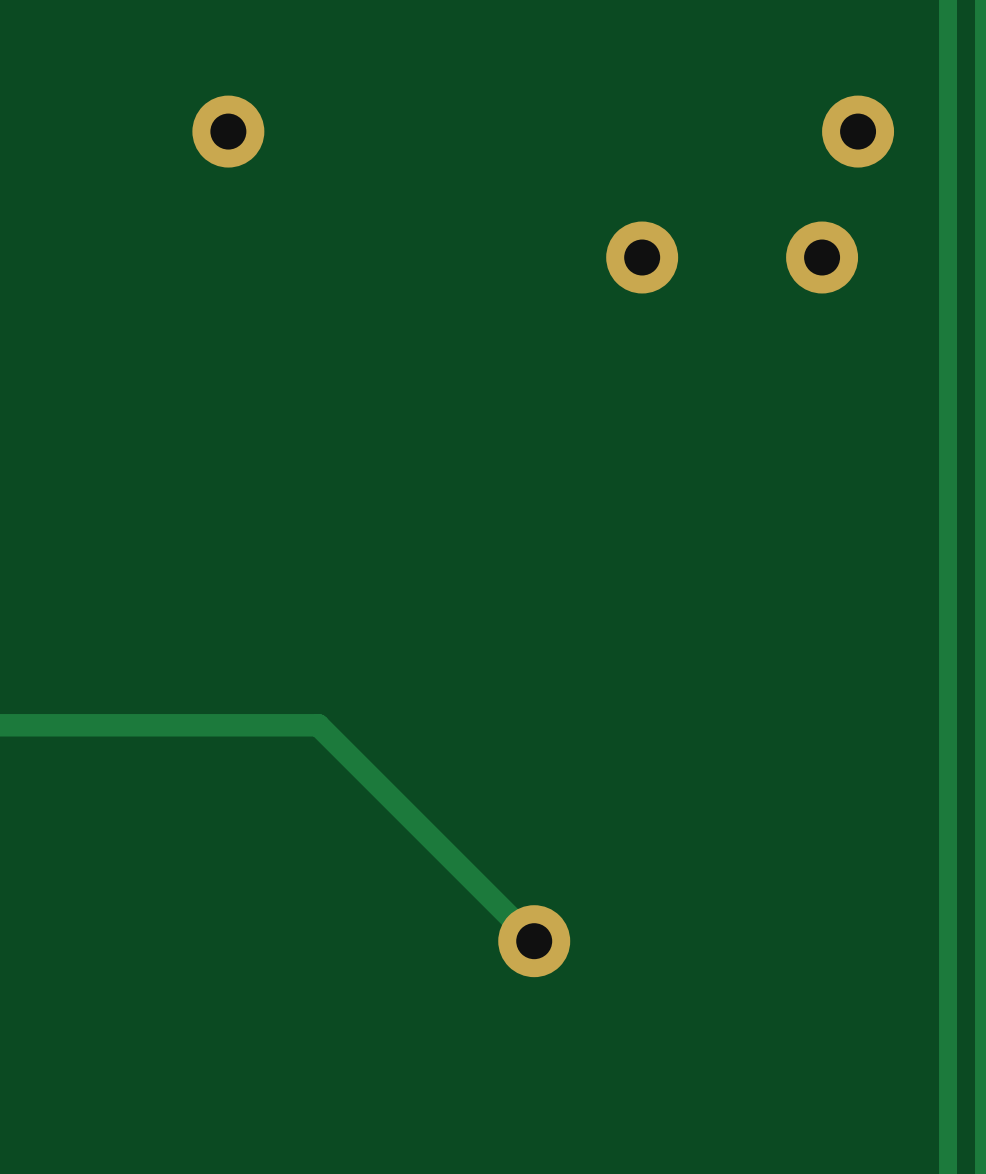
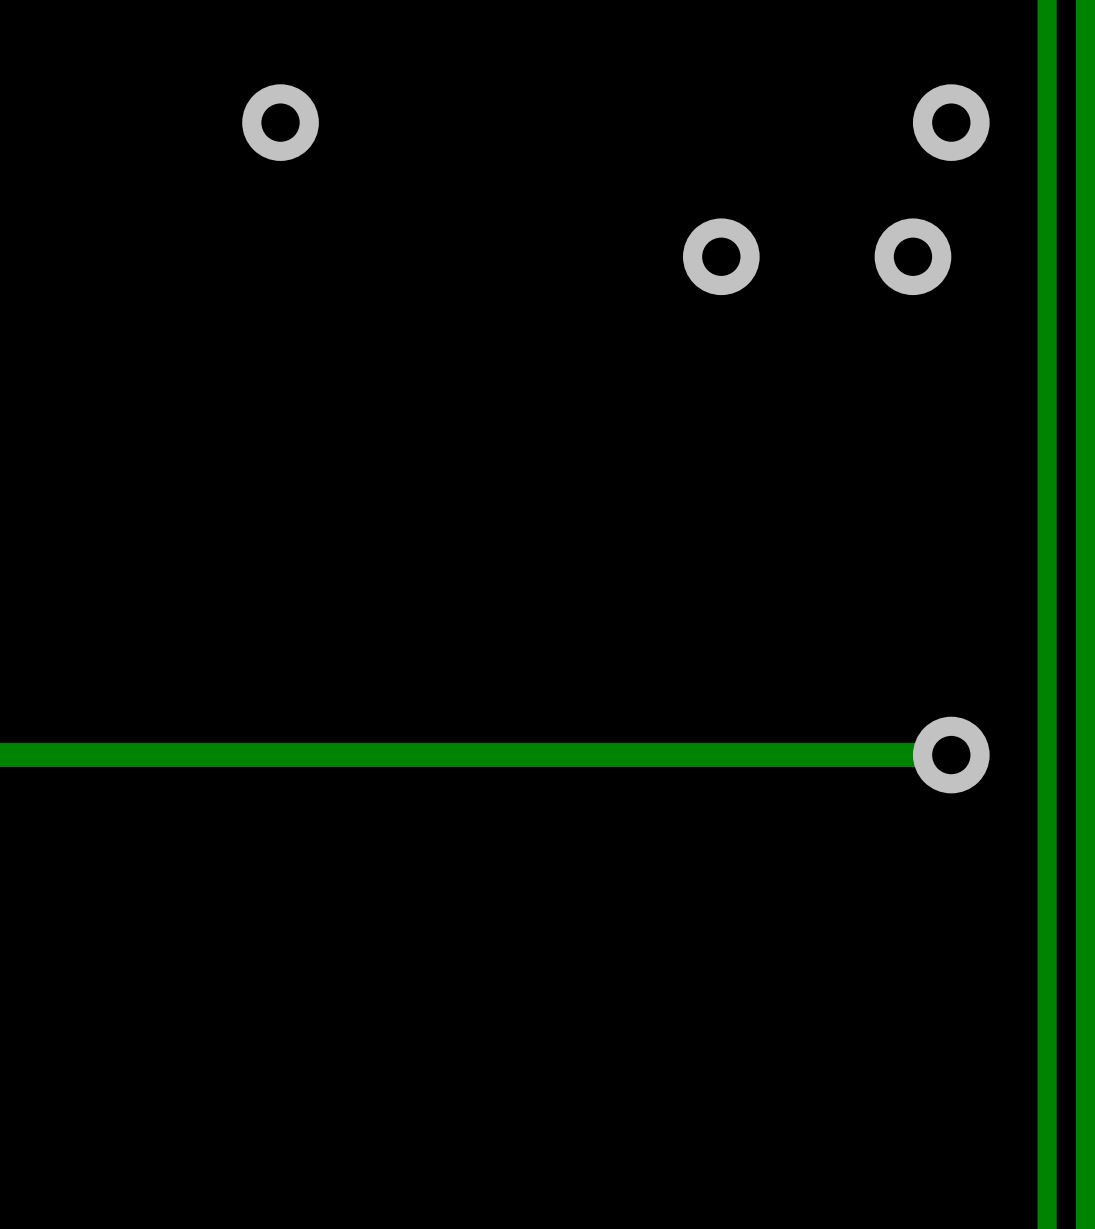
track: (318, 725) (534, 941) -> (376, 755) (951, 755)
via position: (534, 941) -> (951, 755)

